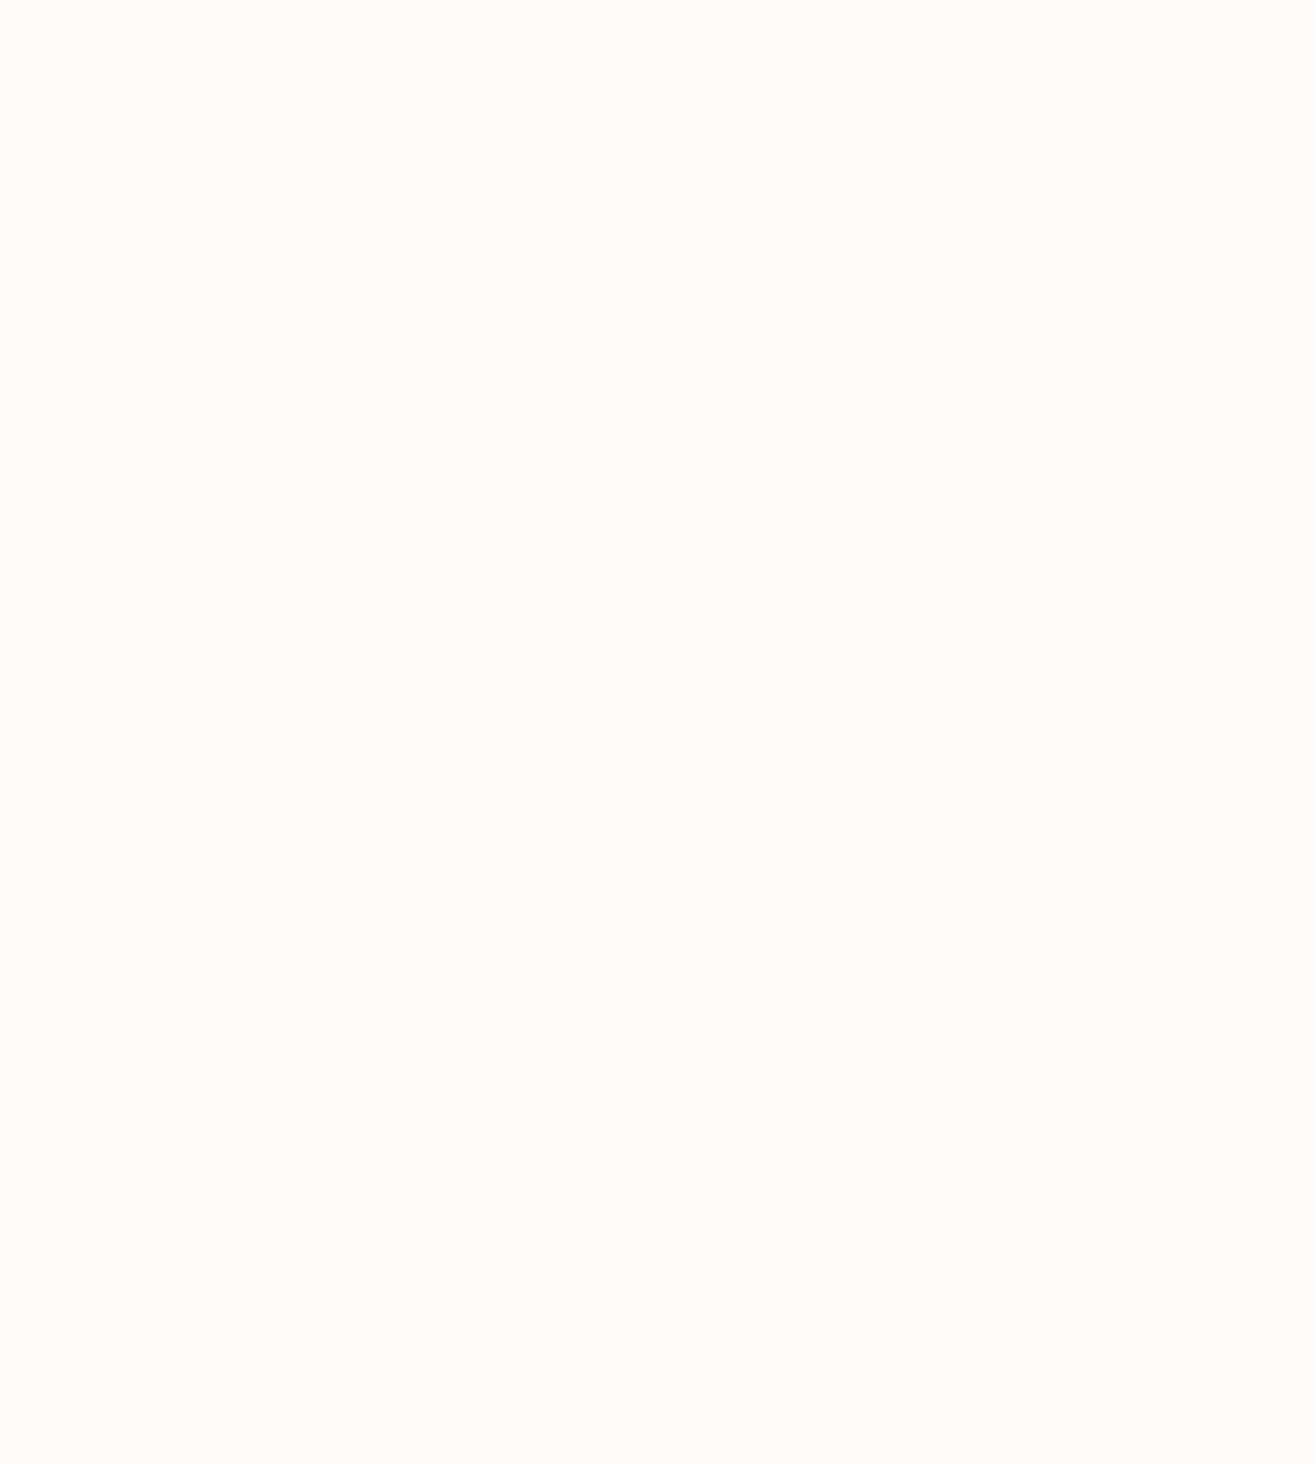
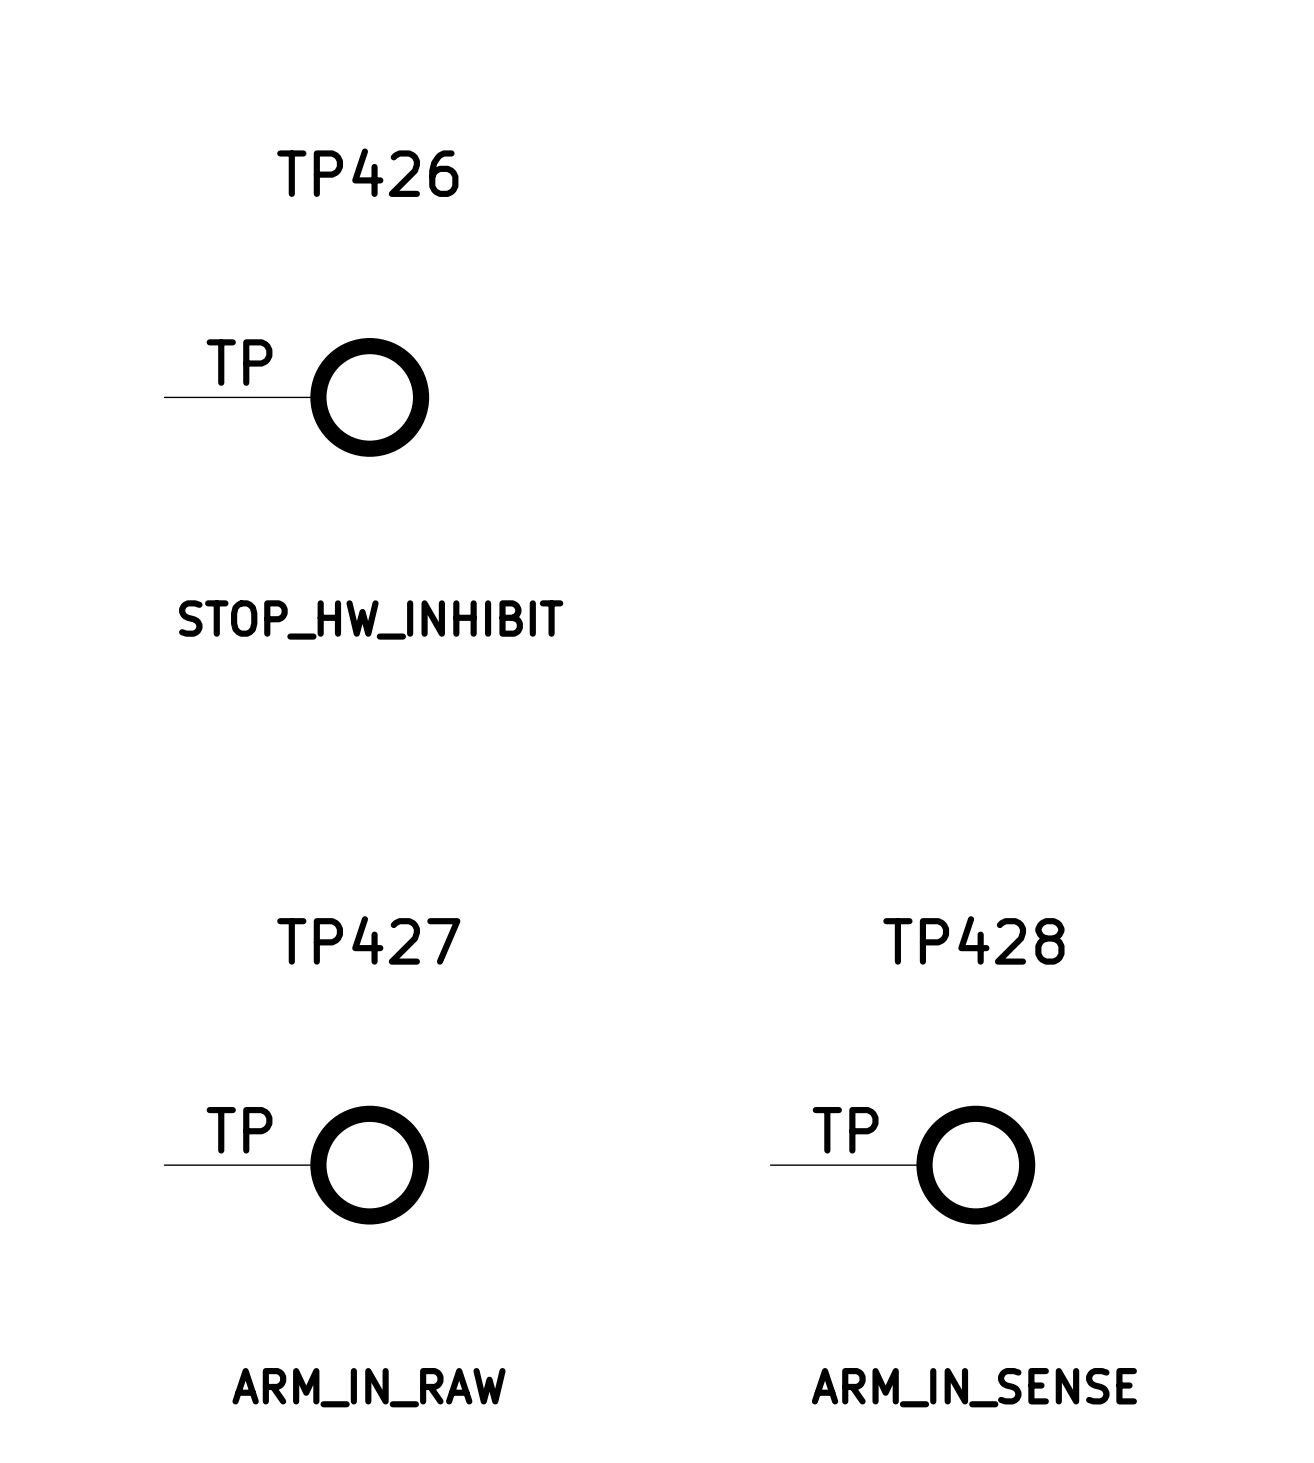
TP426: none -> STOP_HW_INHIBIT (296, 397)
TP427: none -> ARM_IN_RAW (296, 1165)
TP428: none -> ARM_IN_SENSE (902, 1165)

